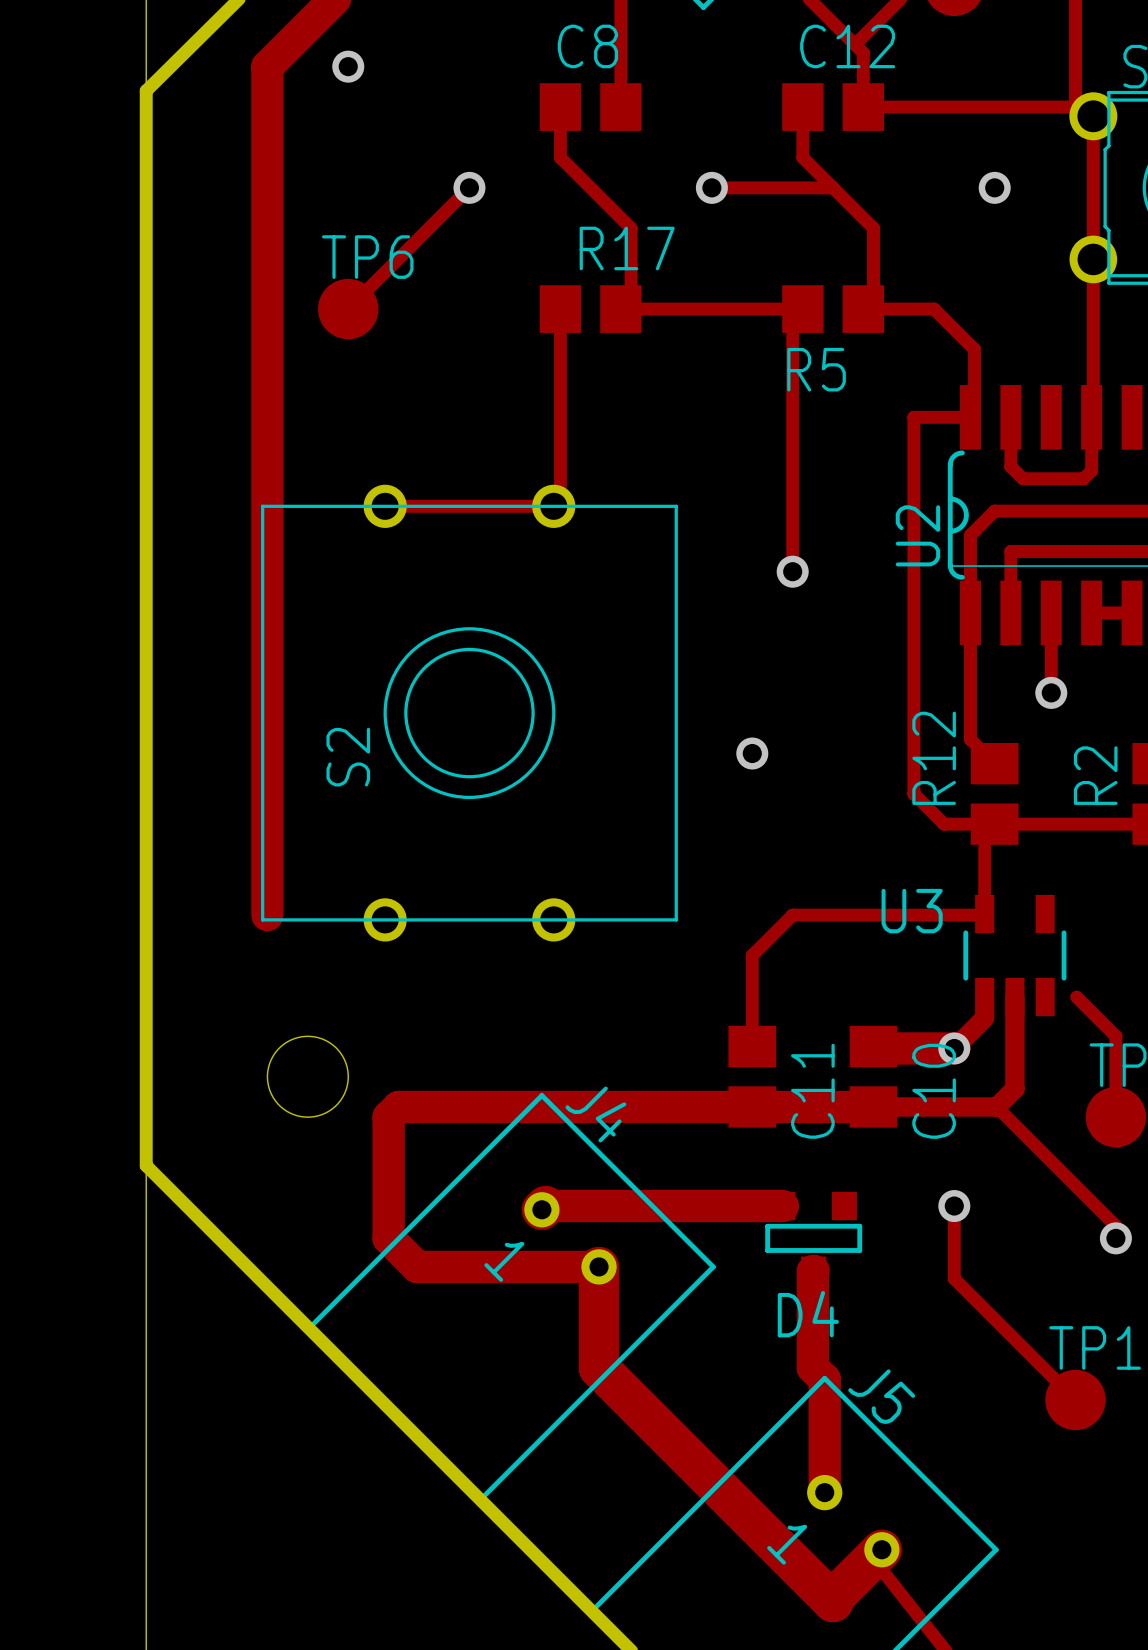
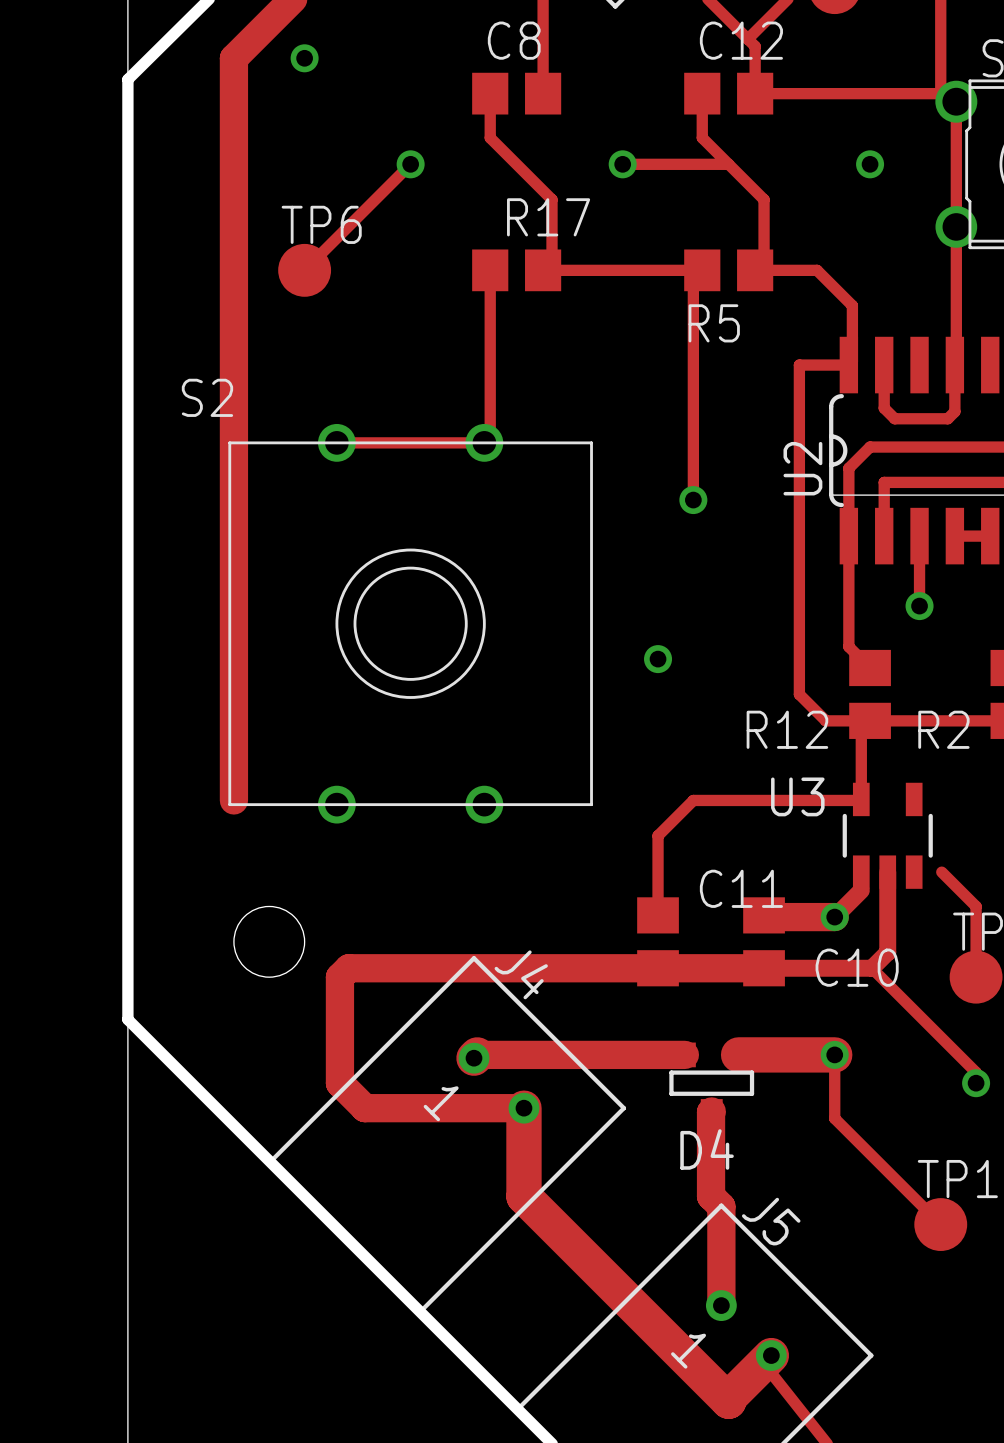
S2 name rotation: 0° (348, 757) -> 90° clockwise (207, 397)
S2 name position: S2 (348, 757) -> S2 (207, 397)
R12 name rotation: 0° (934, 758) -> 90° clockwise (787, 729)
R2 name rotation: 0° (1095, 775) -> 90° clockwise (943, 729)
C11 name rotation: 0° (812, 1091) -> 90° clockwise (741, 888)
C10 name rotation: 0° (934, 1091) -> 90° clockwise (857, 967)
track: none -> (738, 1054) (834, 1054)

